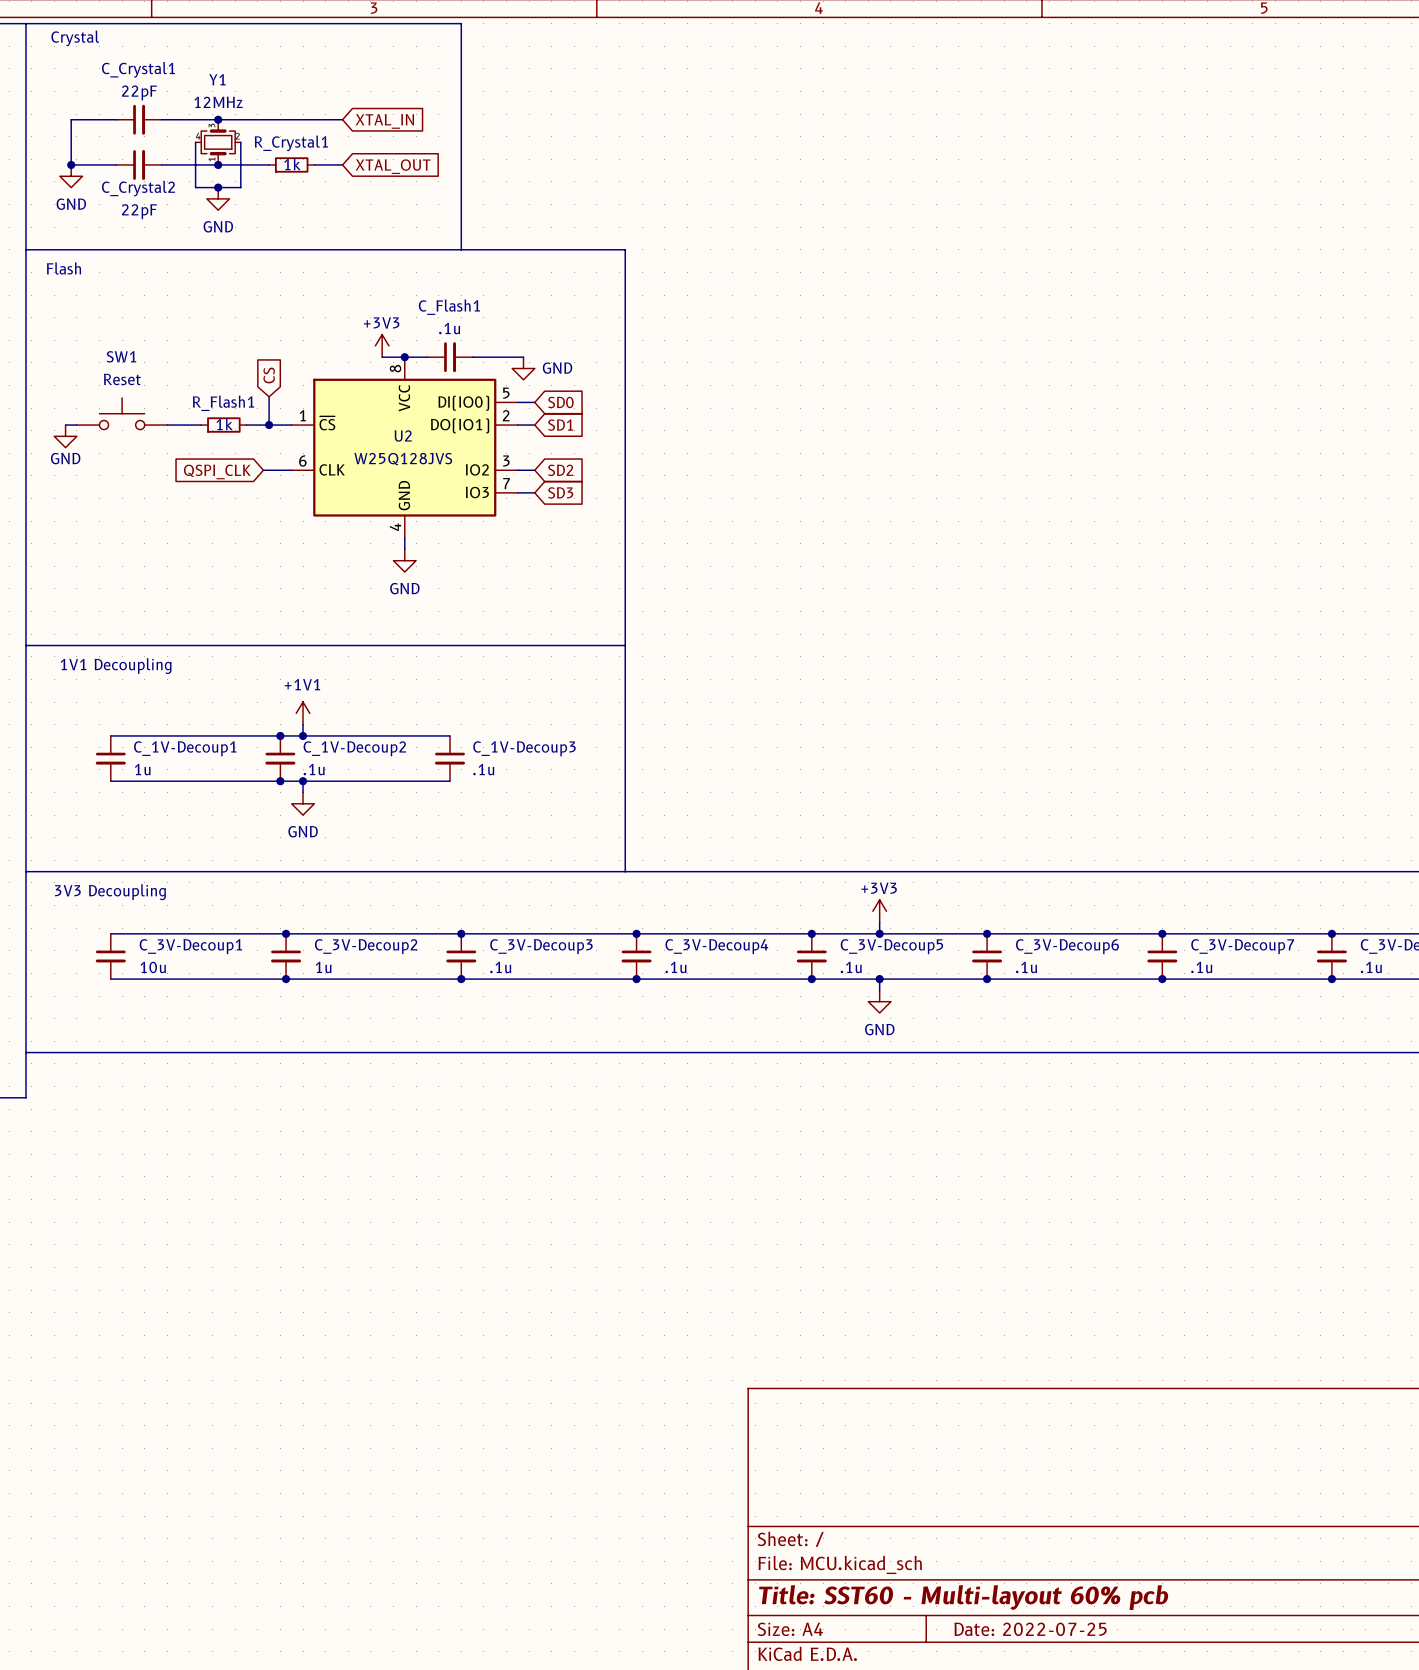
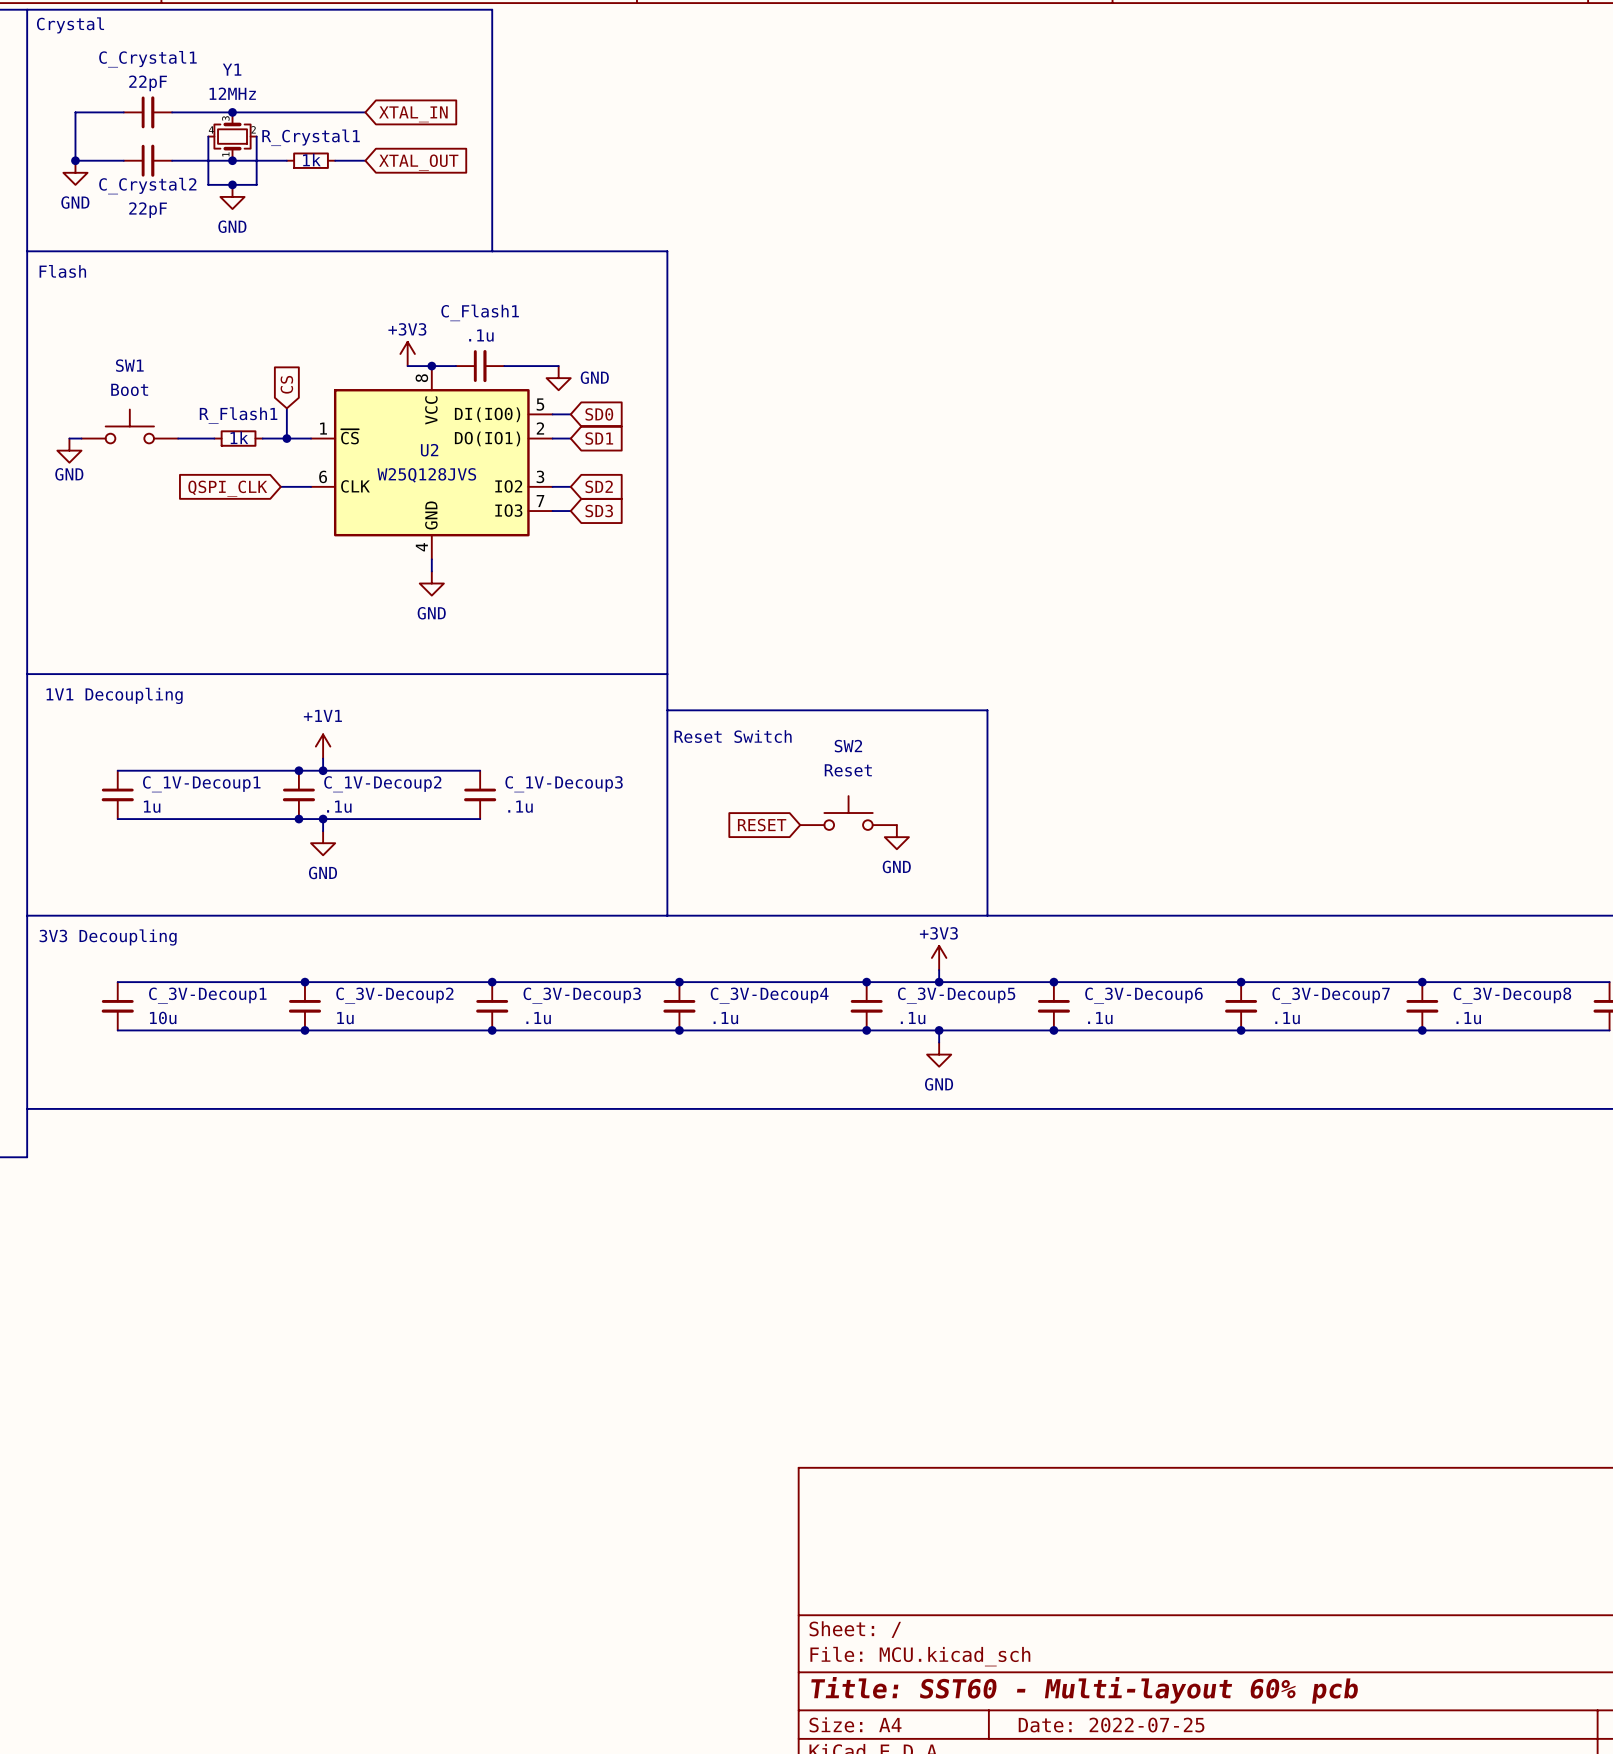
SW1 value: Reset (122, 379) -> Boot (129, 389)
line: none -> (667, 710) (987, 710) (987, 915)
text: none -> Reset Switch (733, 736)
SW2: none -> Reset (848, 813)
global label: none -> RESET (762, 825)
power symbol: none -> GND (896, 837)

